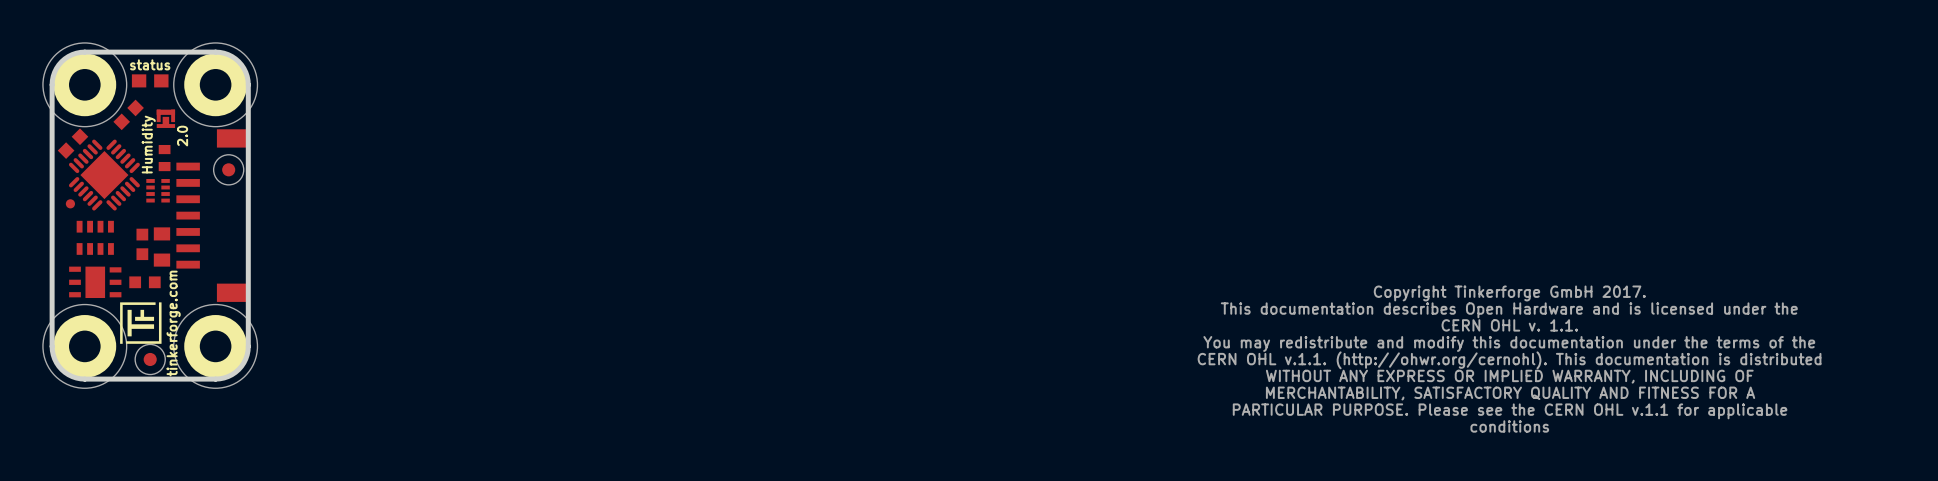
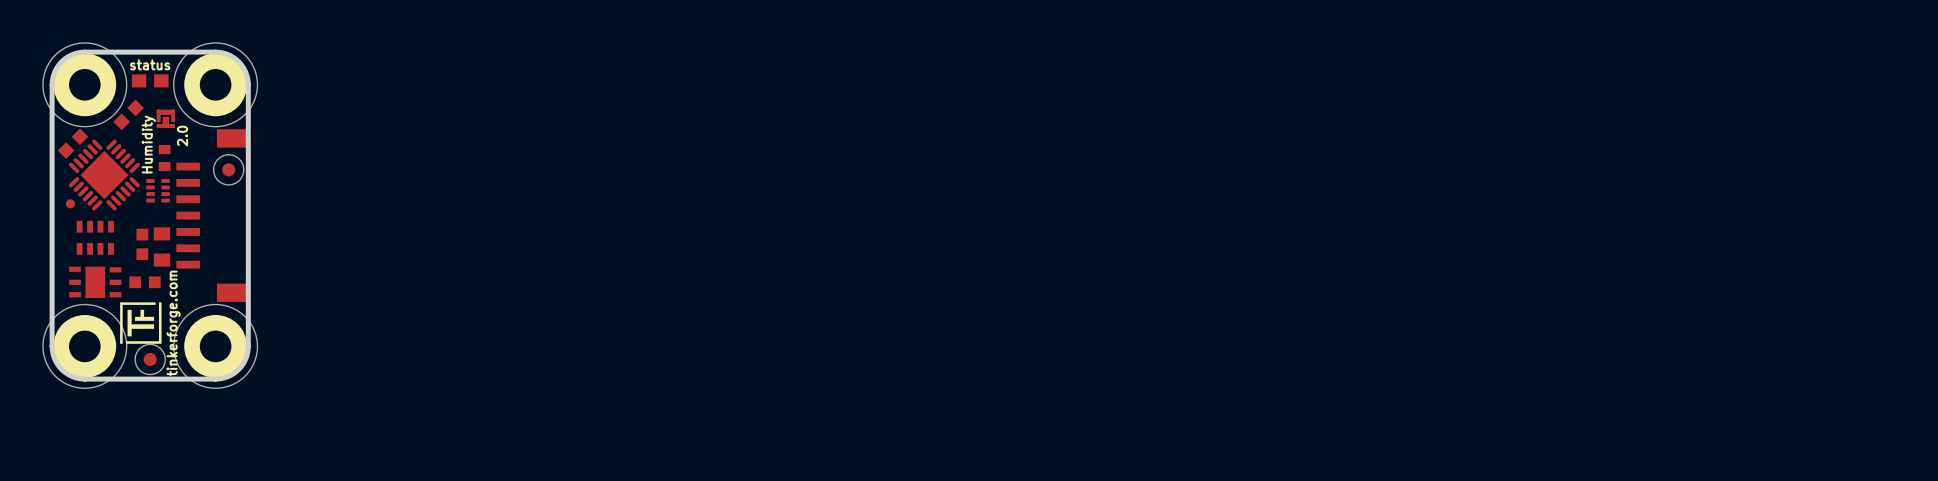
text: Copyright Tinkerforge GmbH 2017. (1509, 293) -> none
text: This documentation describes Open Hardware and is licensed under the (1509, 310) -> none
text: CERN OHL v. 1.1. (1509, 325) -> none
text: You may redistribute and modify this documentation under the terms of the (1509, 343) -> none
text: CERN OHL v.1.1. (http://ohwr.org/cernohl). This documentation is distributed (1509, 360) -> none
text: WITHOUT ANY EXPRESS OR IMPLIED WARRANTY, INCLUDING OF (1509, 376) -> none
text: MERCHANTABILITY, SATISFACTORY QUALITY AND FITNESS FOR A (1510, 393) -> none
text: PARTICULAR PURPOSE. Please see the CERN OHL v.1.1 for applicable (1510, 411) -> none
text: conditions (1509, 426) -> none

